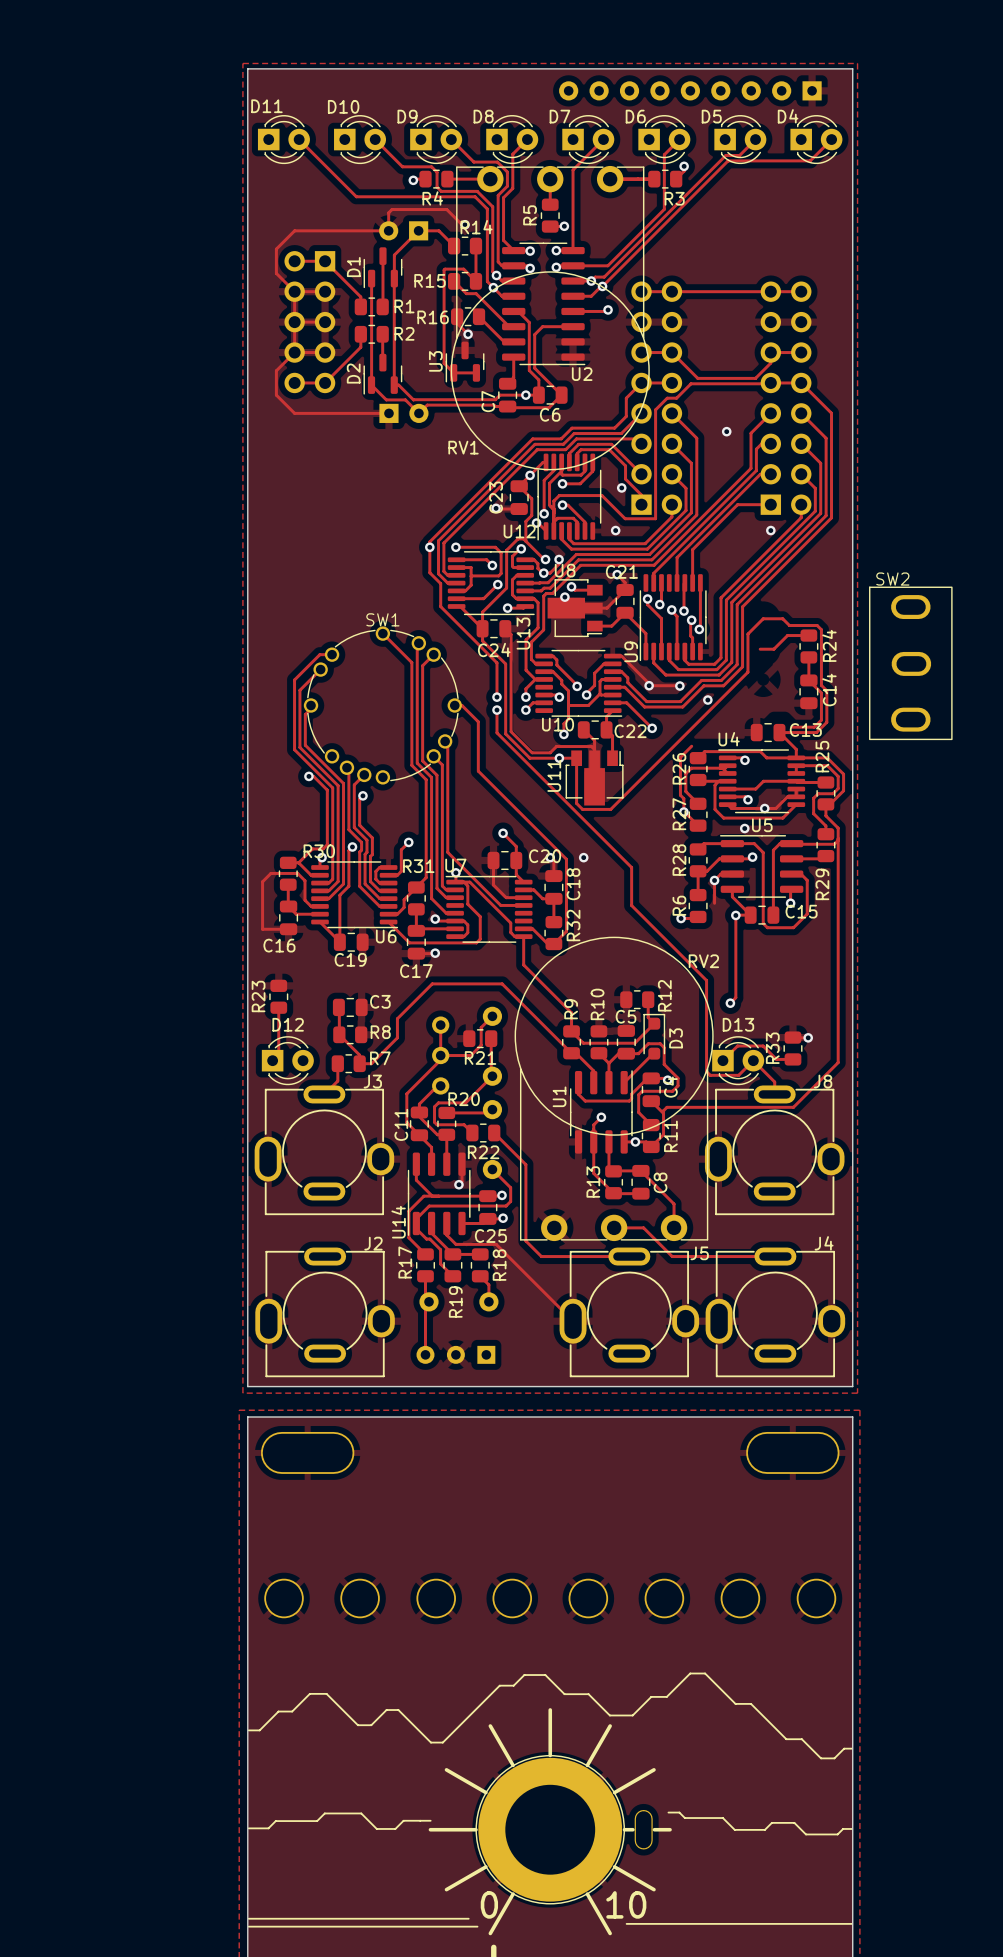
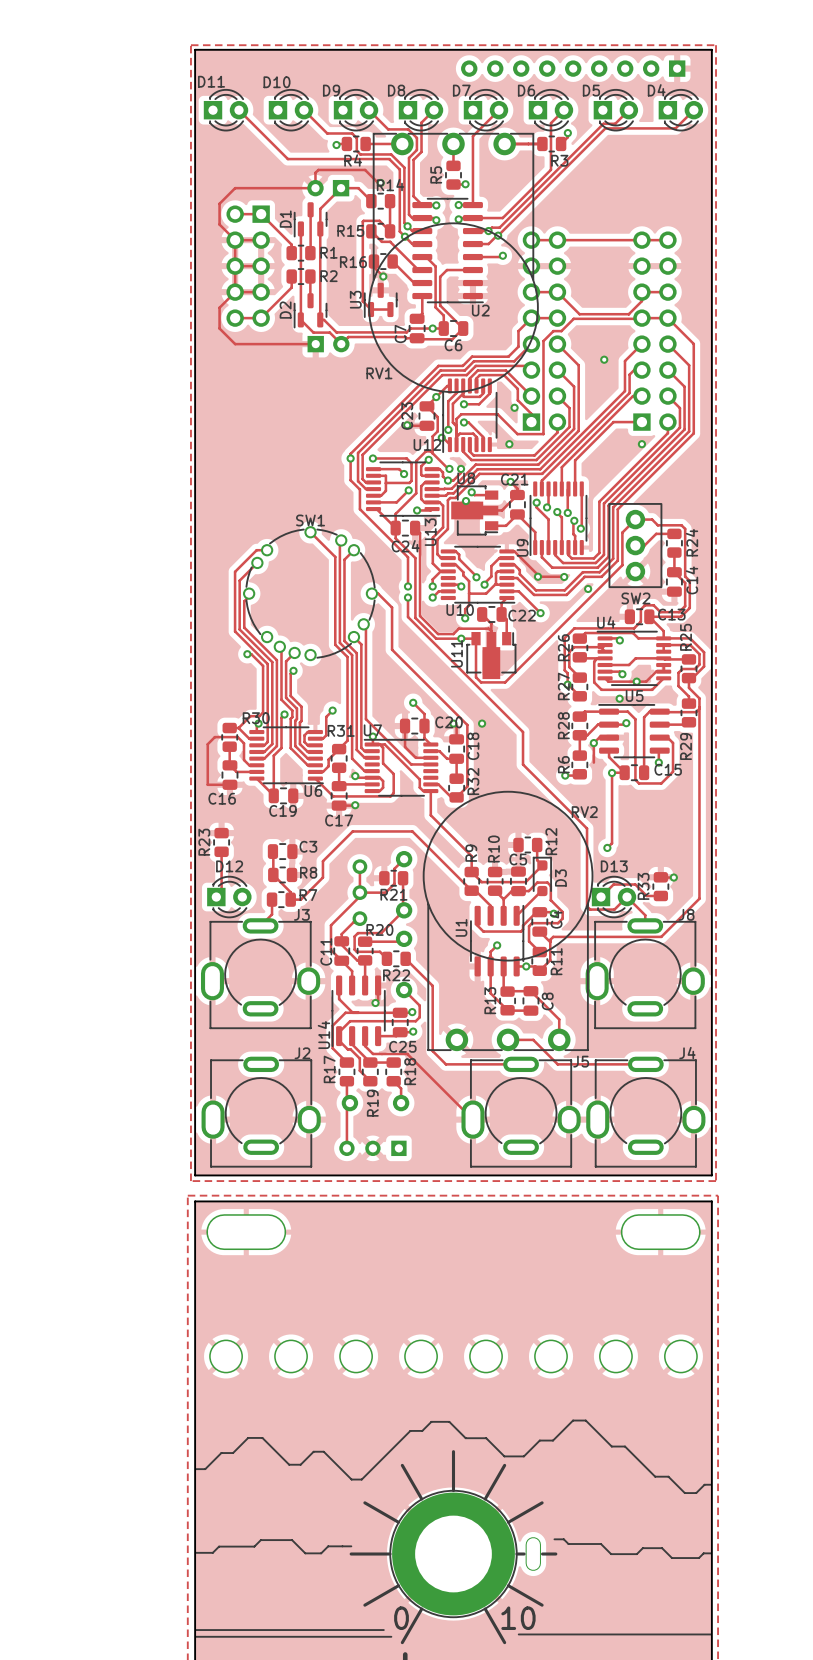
SW2 name position: SW2 (892, 579) -> SW2 (635, 598)
SW2 footprint: [869, 586, 953, 741] -> [608, 503, 663, 588]
track: none -> (660, 612) (653, 605) (644, 605) (640, 609) (640, 621) (634, 628) (574, 628)

